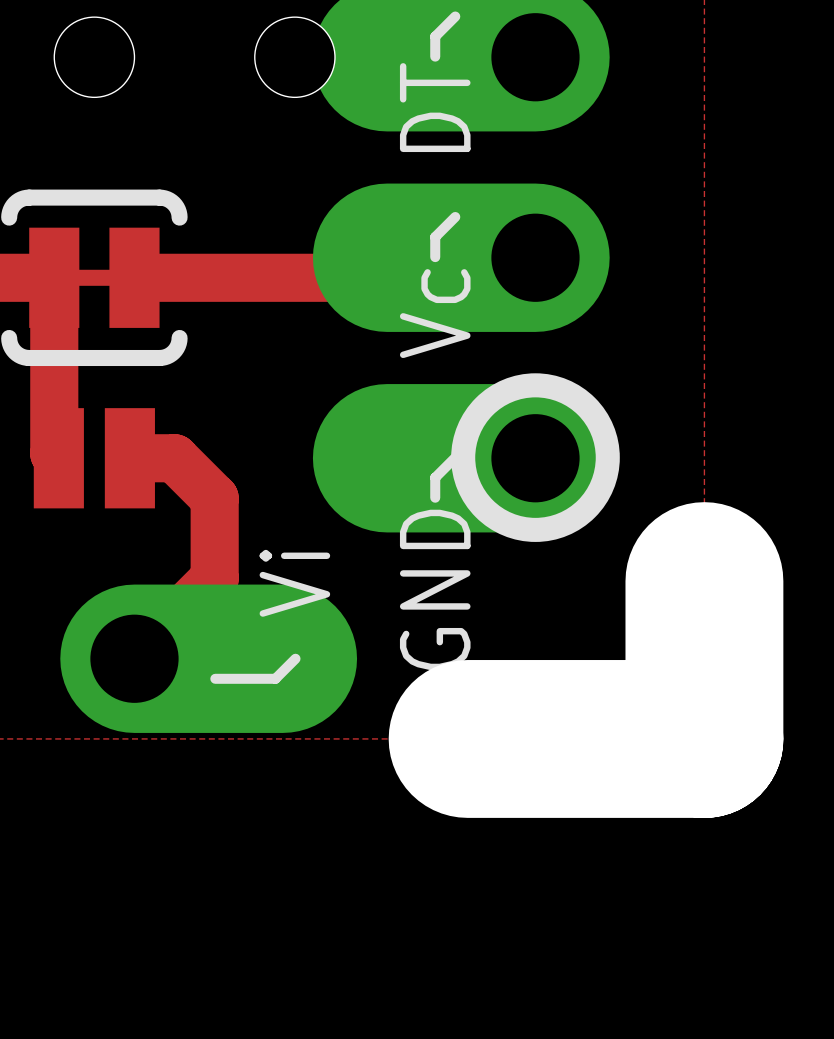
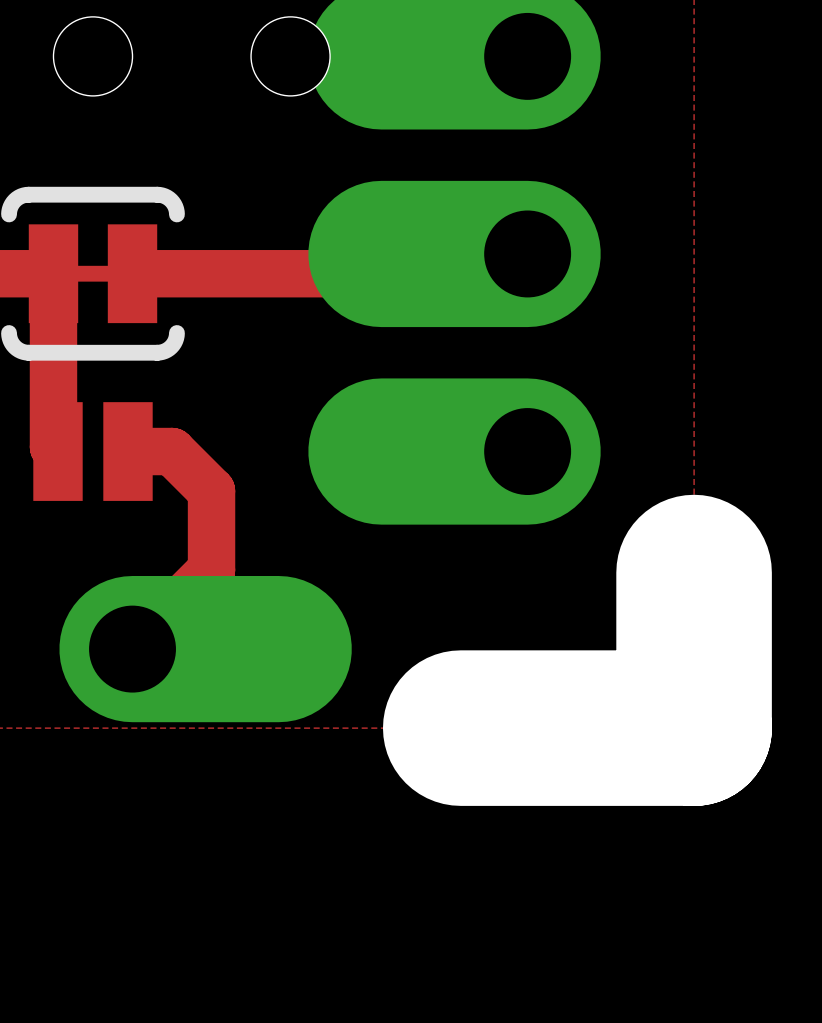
line: (455, 16) (435, 36) (435, 56) -> none
text: DT (435, 107) -> none
line: (455, 217) (435, 237) (435, 257) -> none
text: Vc (435, 313) -> none
drawing: [451, 373, 620, 542] -> none
line: (455, 457) (435, 477) (435, 497) -> none
text: Vi (294, 583) -> none
text: GND (435, 589) -> none
line: (295, 658) (275, 678) (215, 678) -> none

